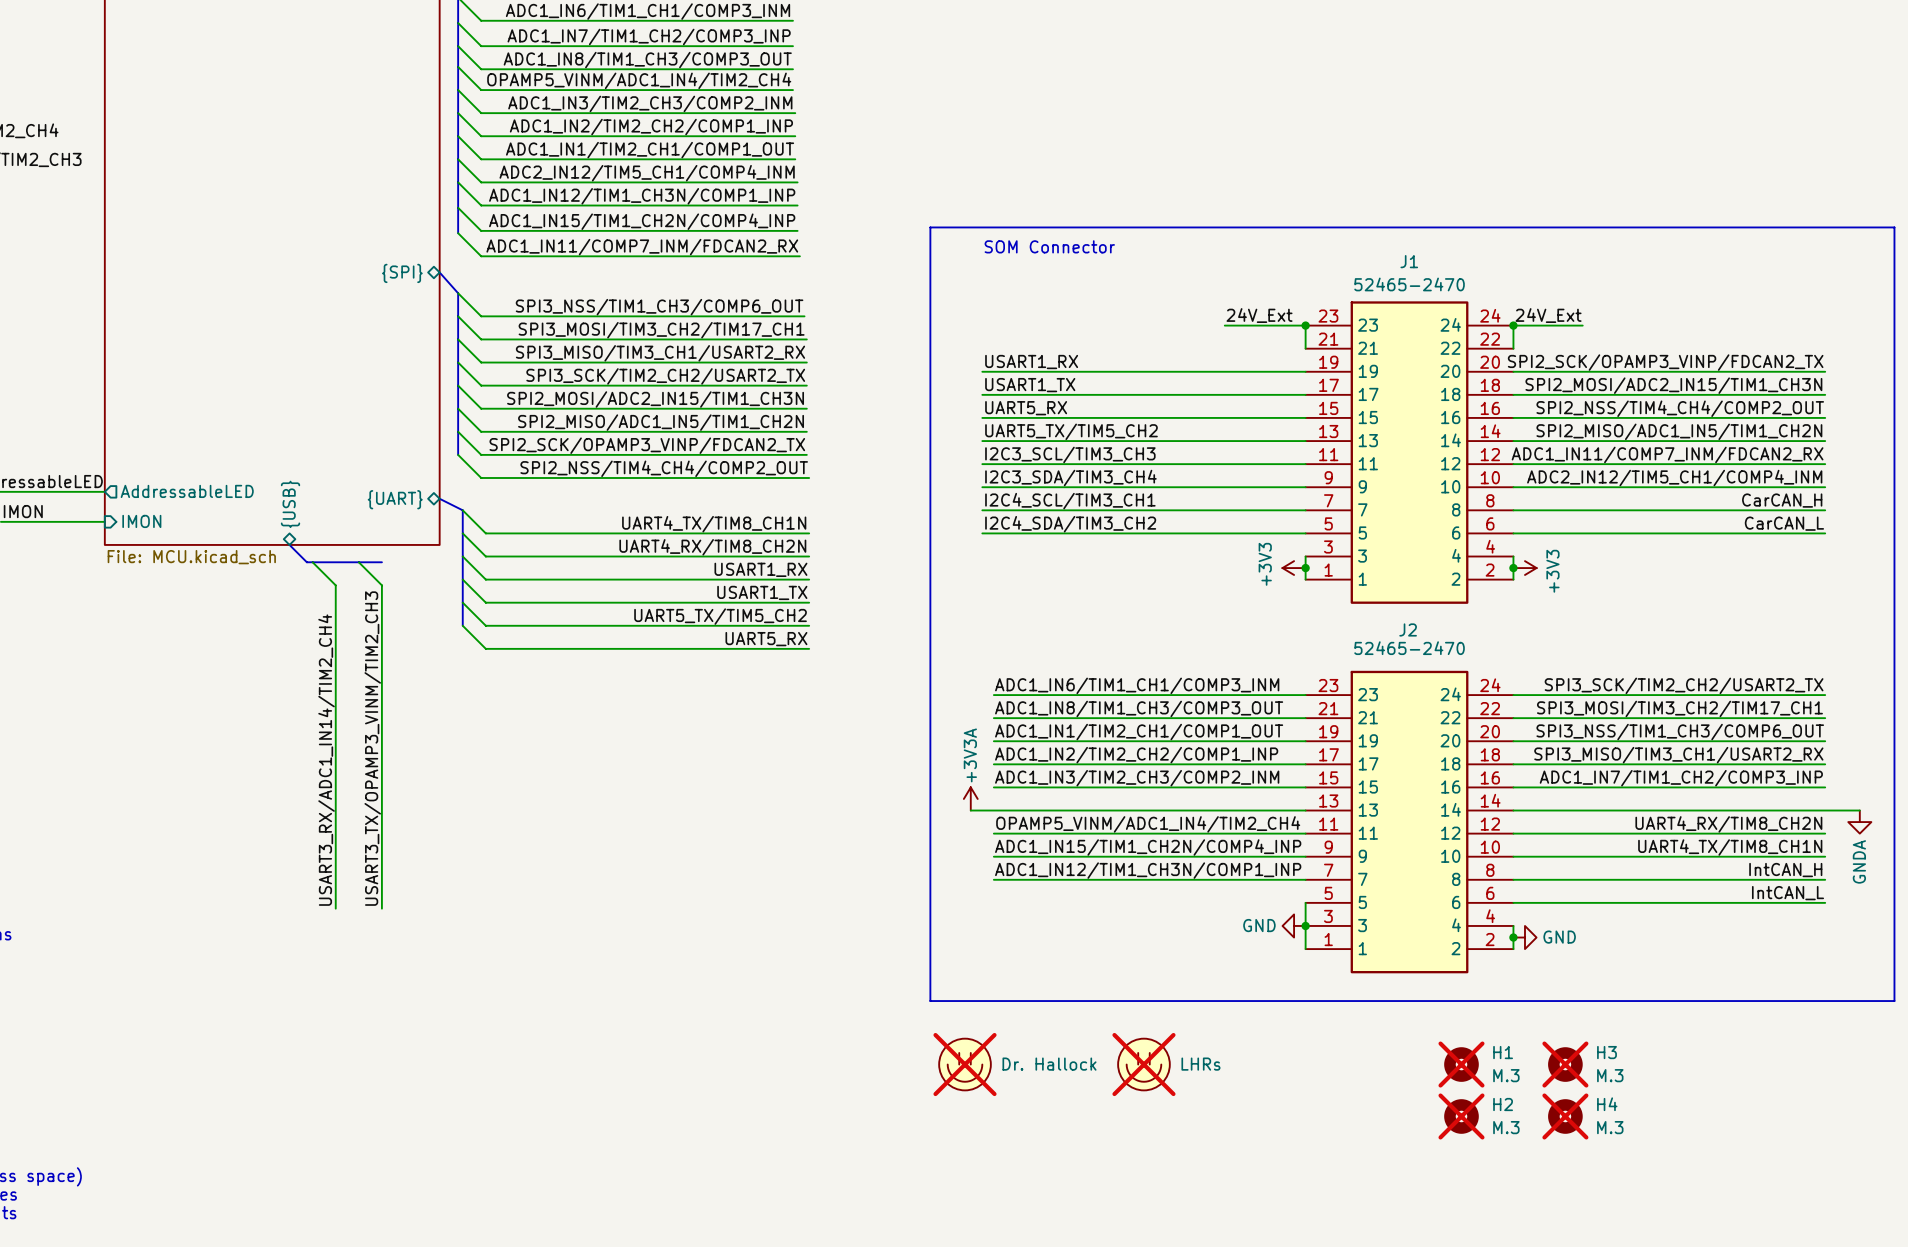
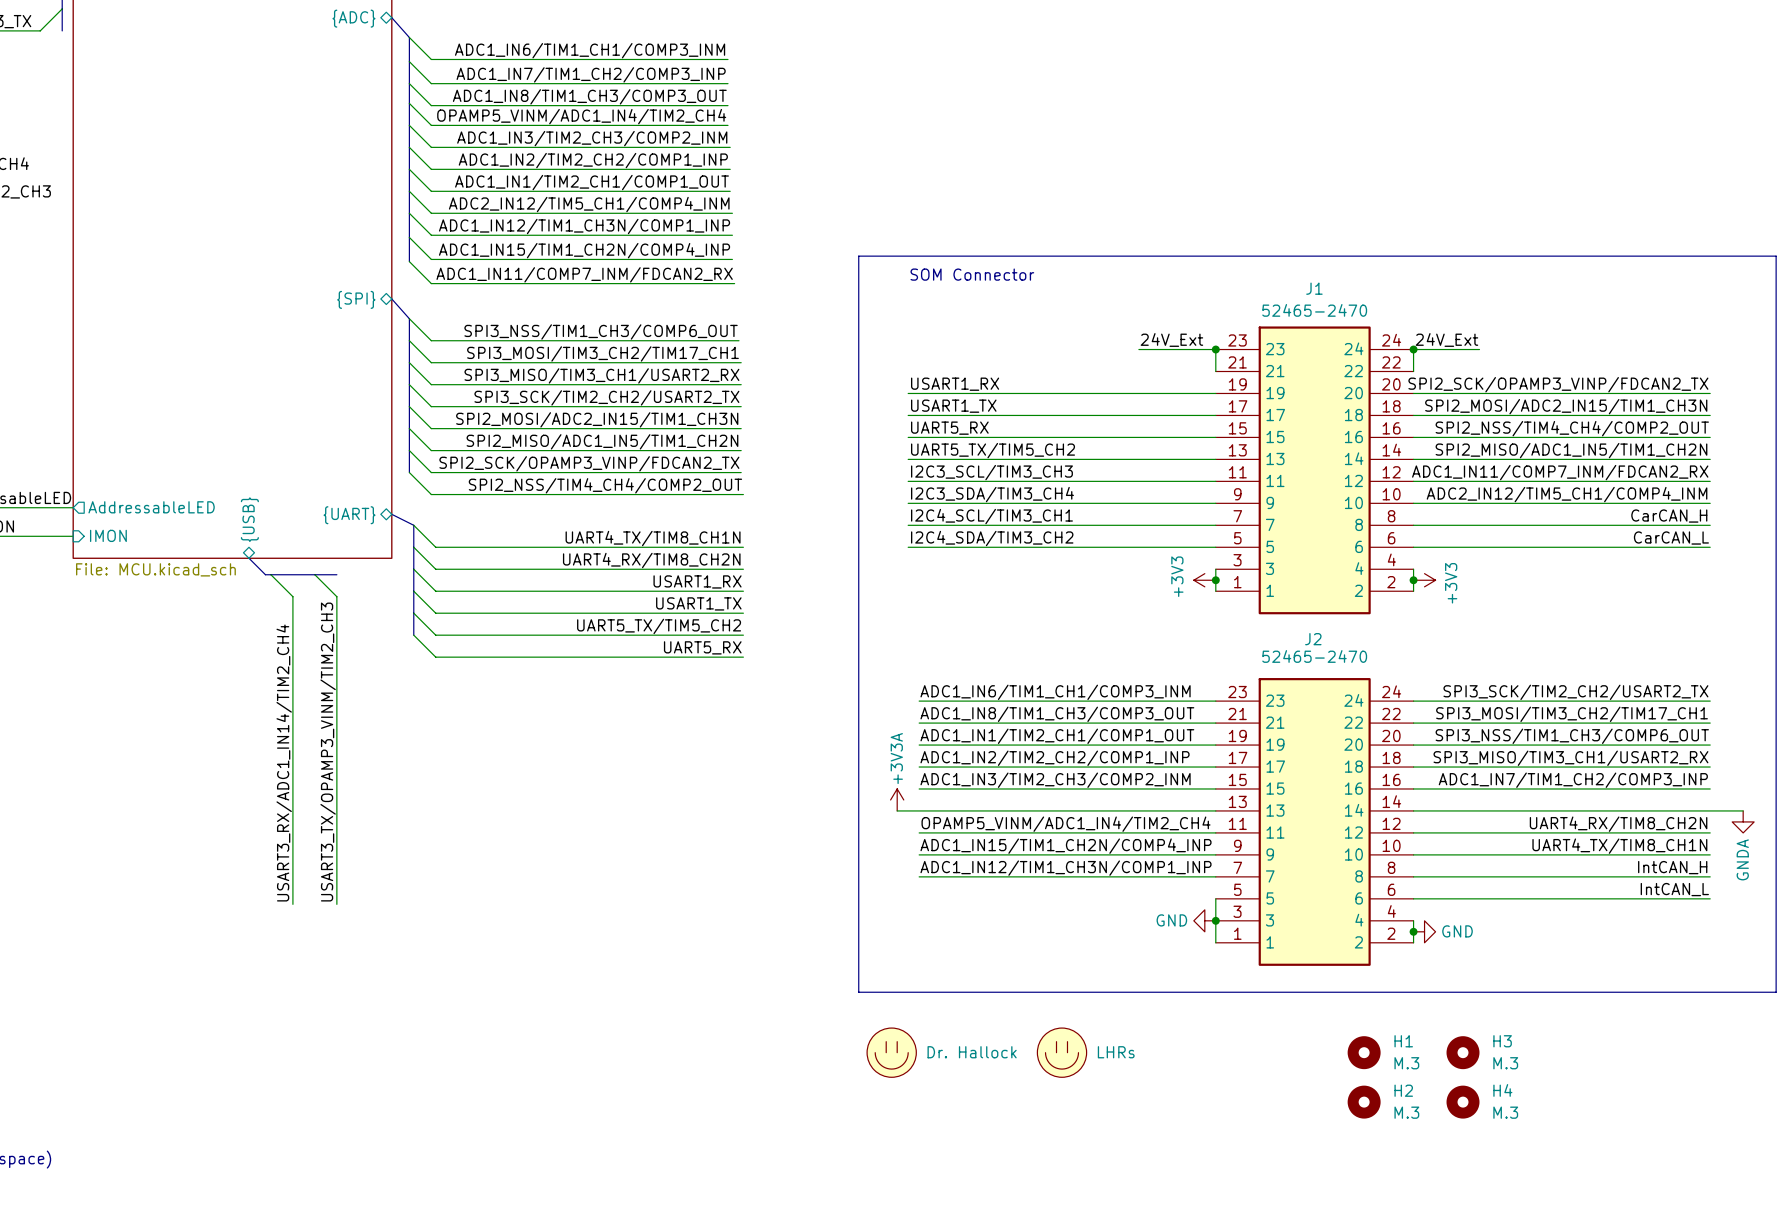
part do-not-place cross: (965, 1064) -> none
part do-not-place cross: (1143, 1064) -> none
H1 do-not-place cross: (1461, 1064) -> none
H3 do-not-place cross: (1565, 1064) -> none
H2 do-not-place cross: (1461, 1116) -> none
H4 do-not-place cross: (1565, 1116) -> none

